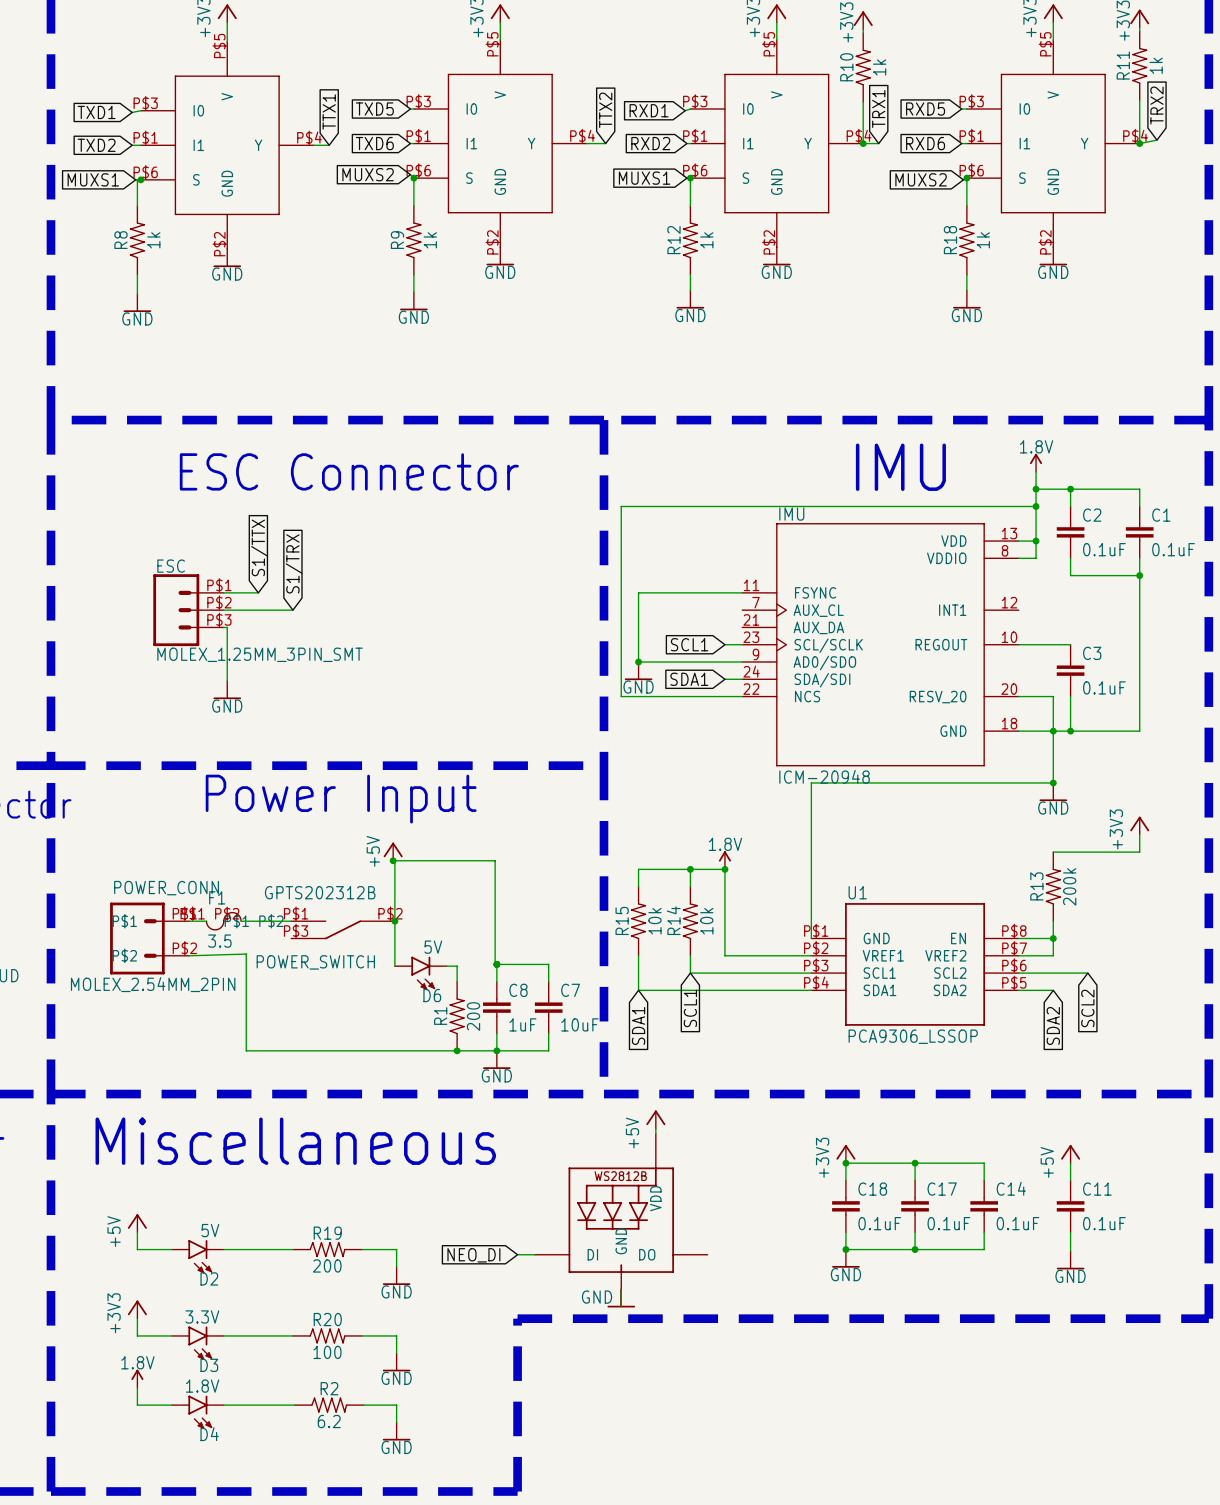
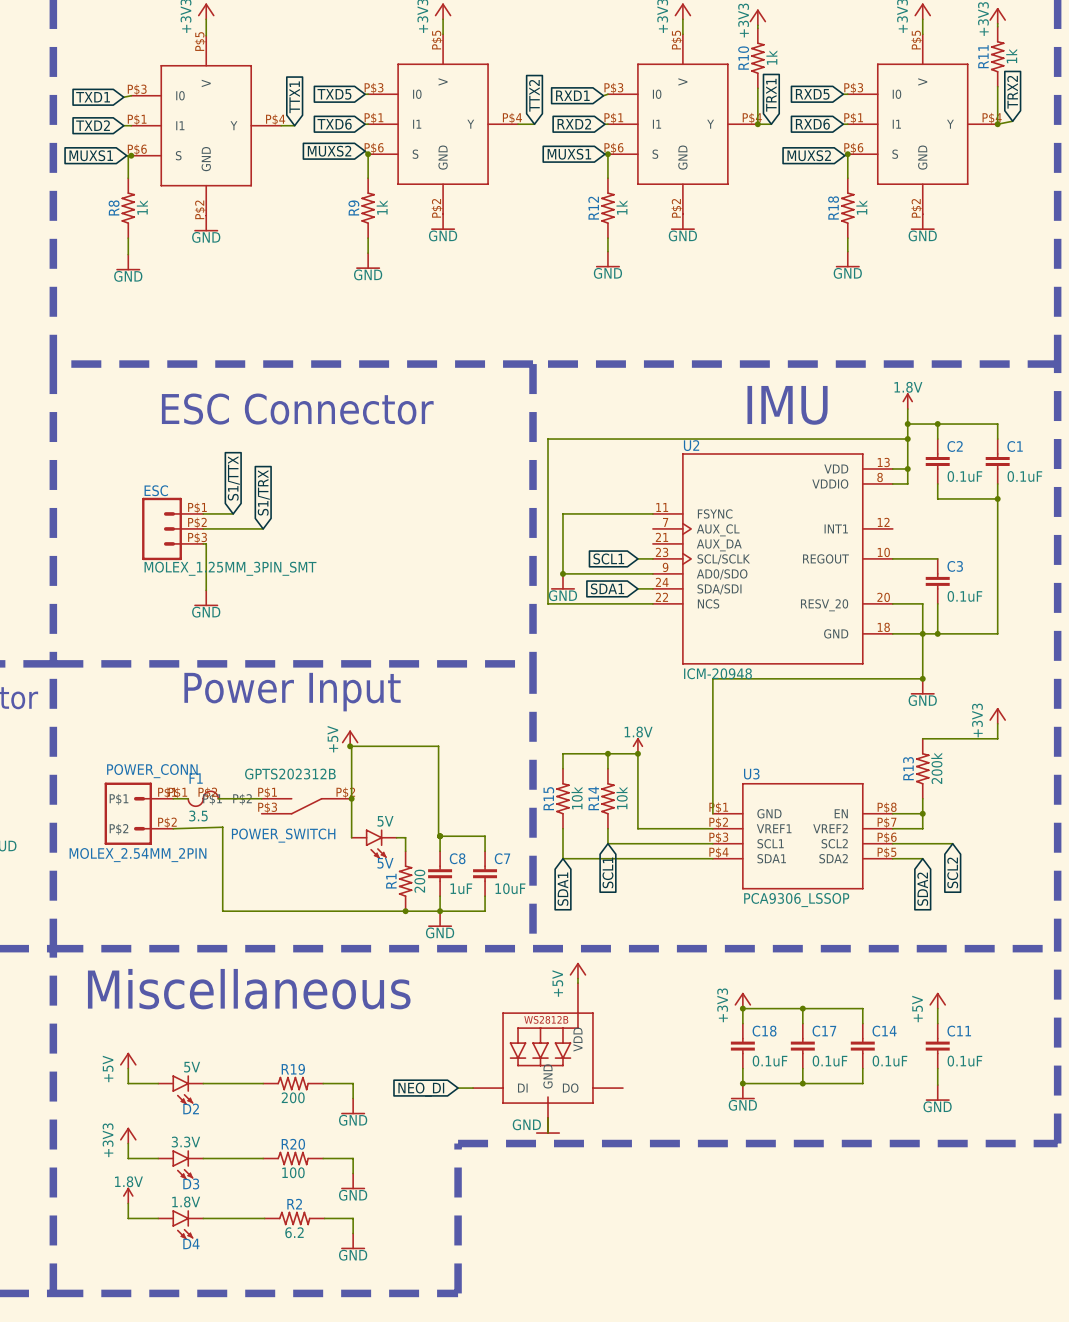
IMU name: IMU (791, 514) -> U2 (691, 445)
U1 name: U1 (857, 892) -> U3 (751, 774)
D6 name: D6 (432, 995) -> 5V (385, 863)

